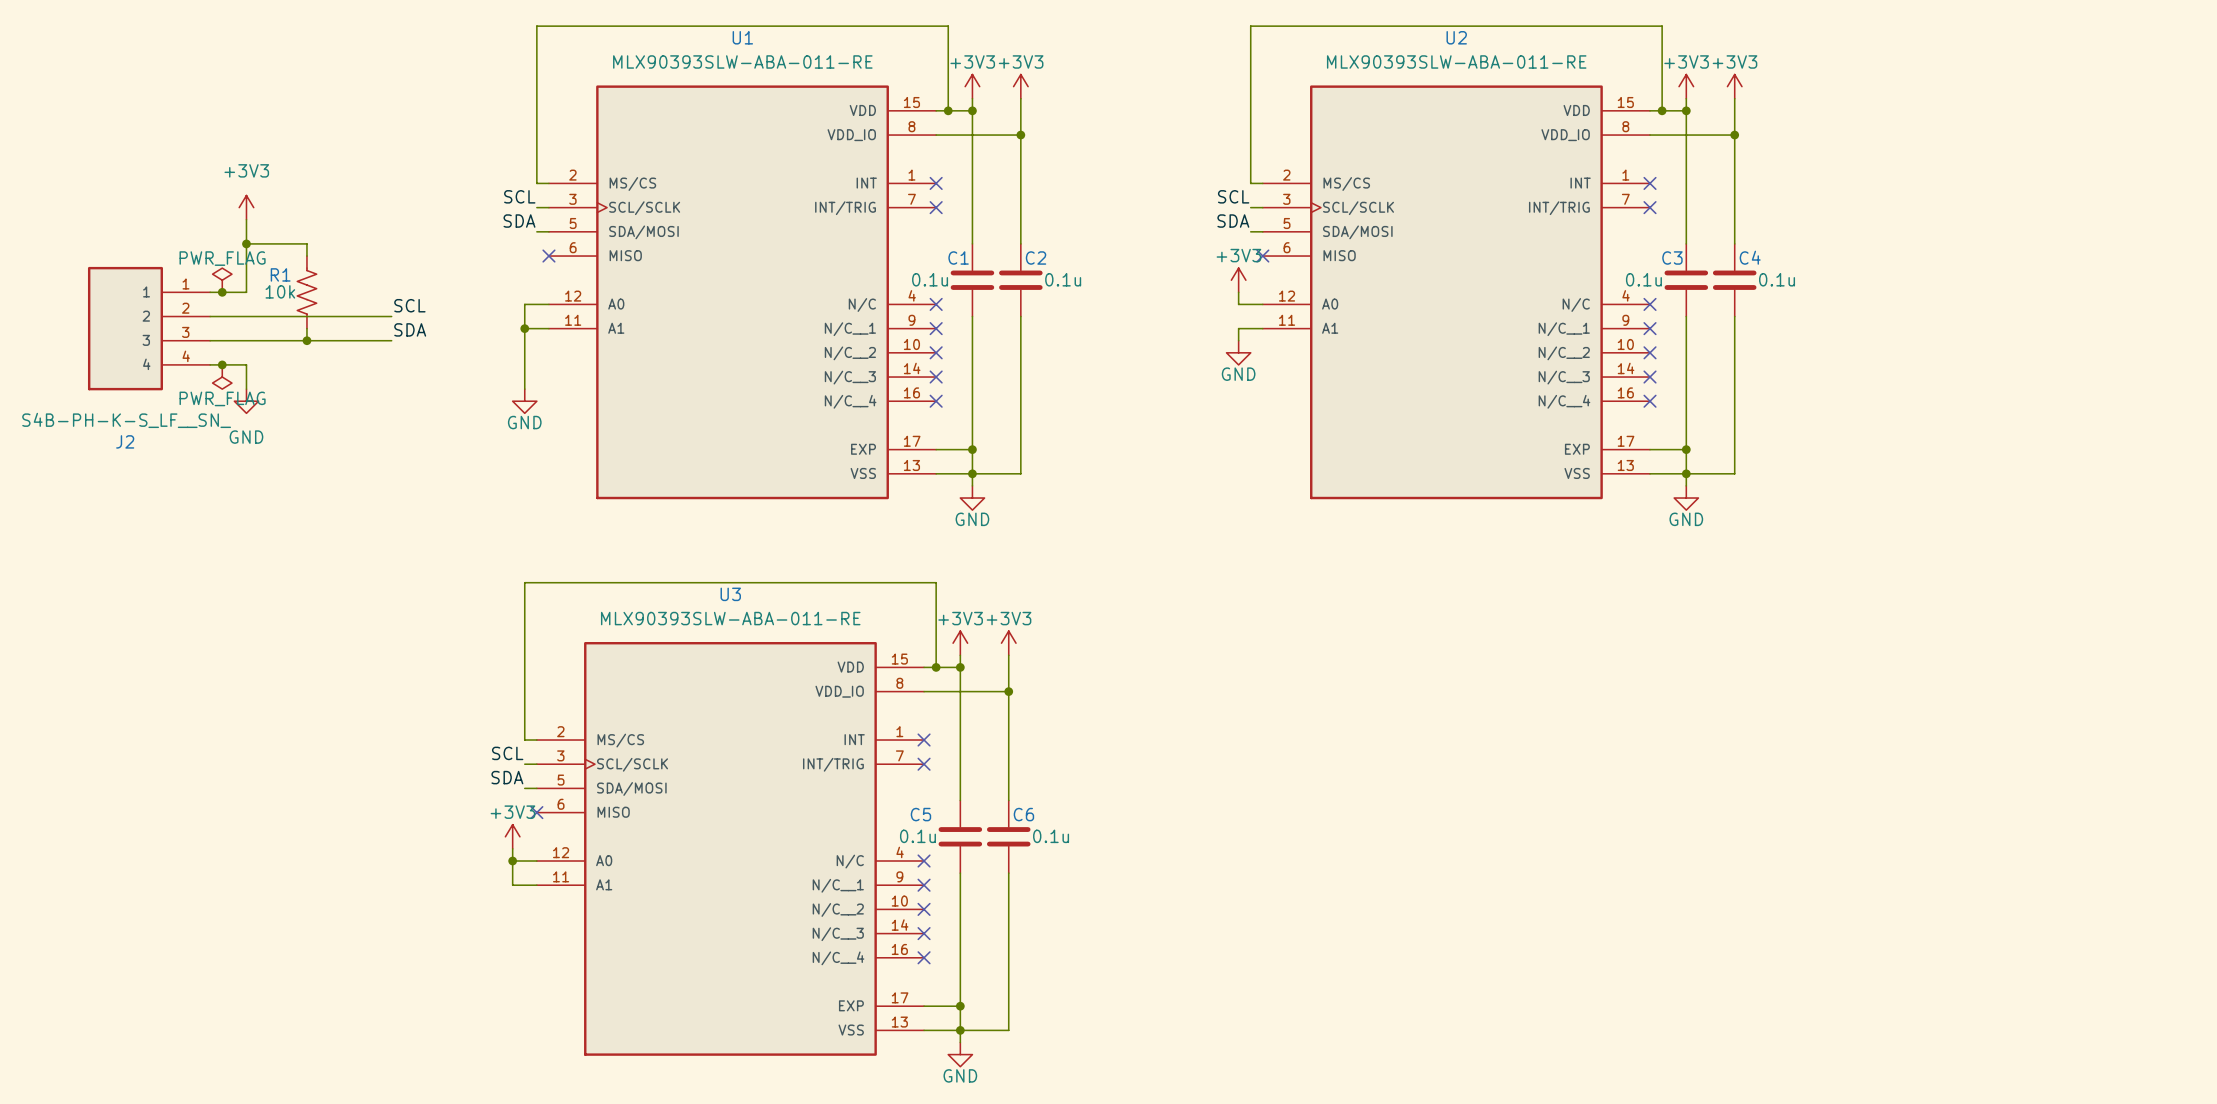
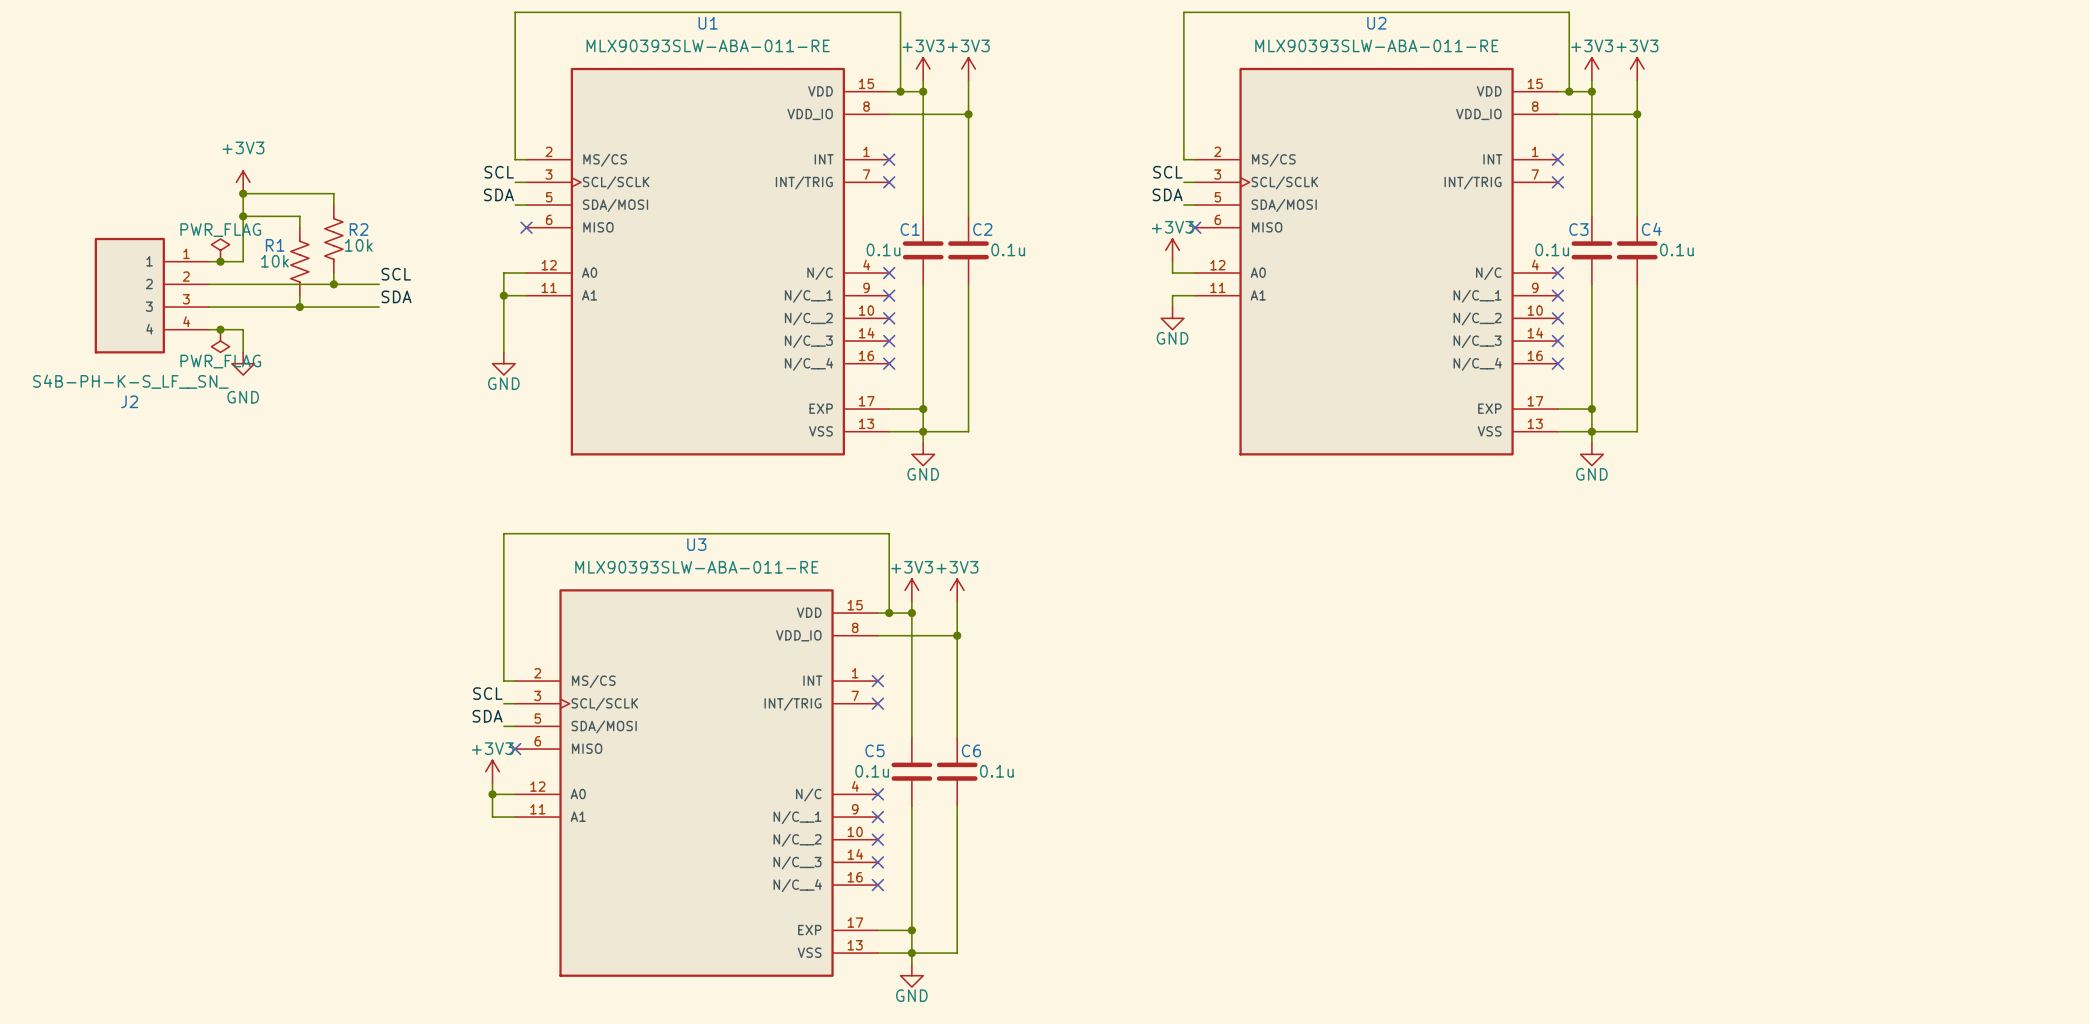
wire: none -> (243, 193) (333, 193) (333, 205)
junction: none -> (243, 193)
R2: none -> 10k (333, 239)
wire: none -> (333, 273) (333, 284)
junction: none -> (333, 284)

